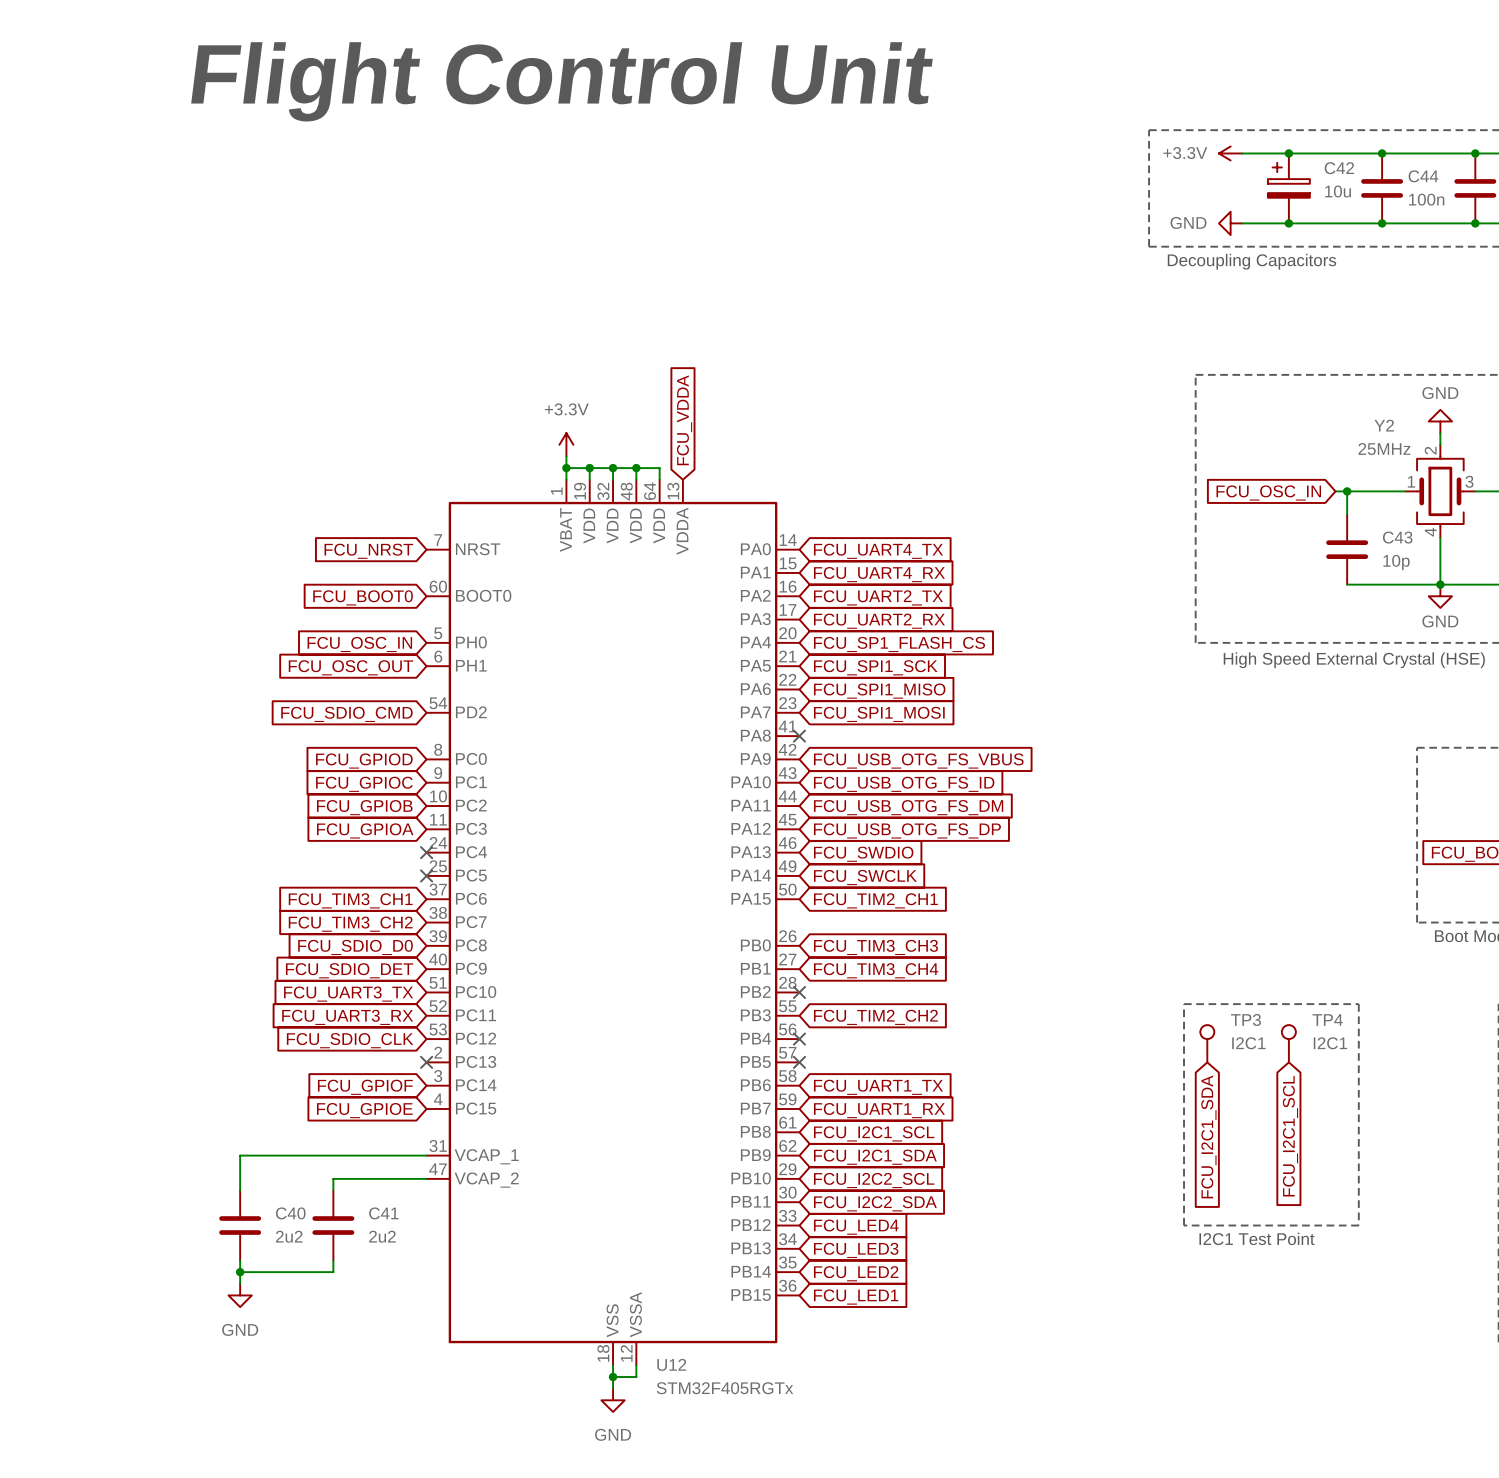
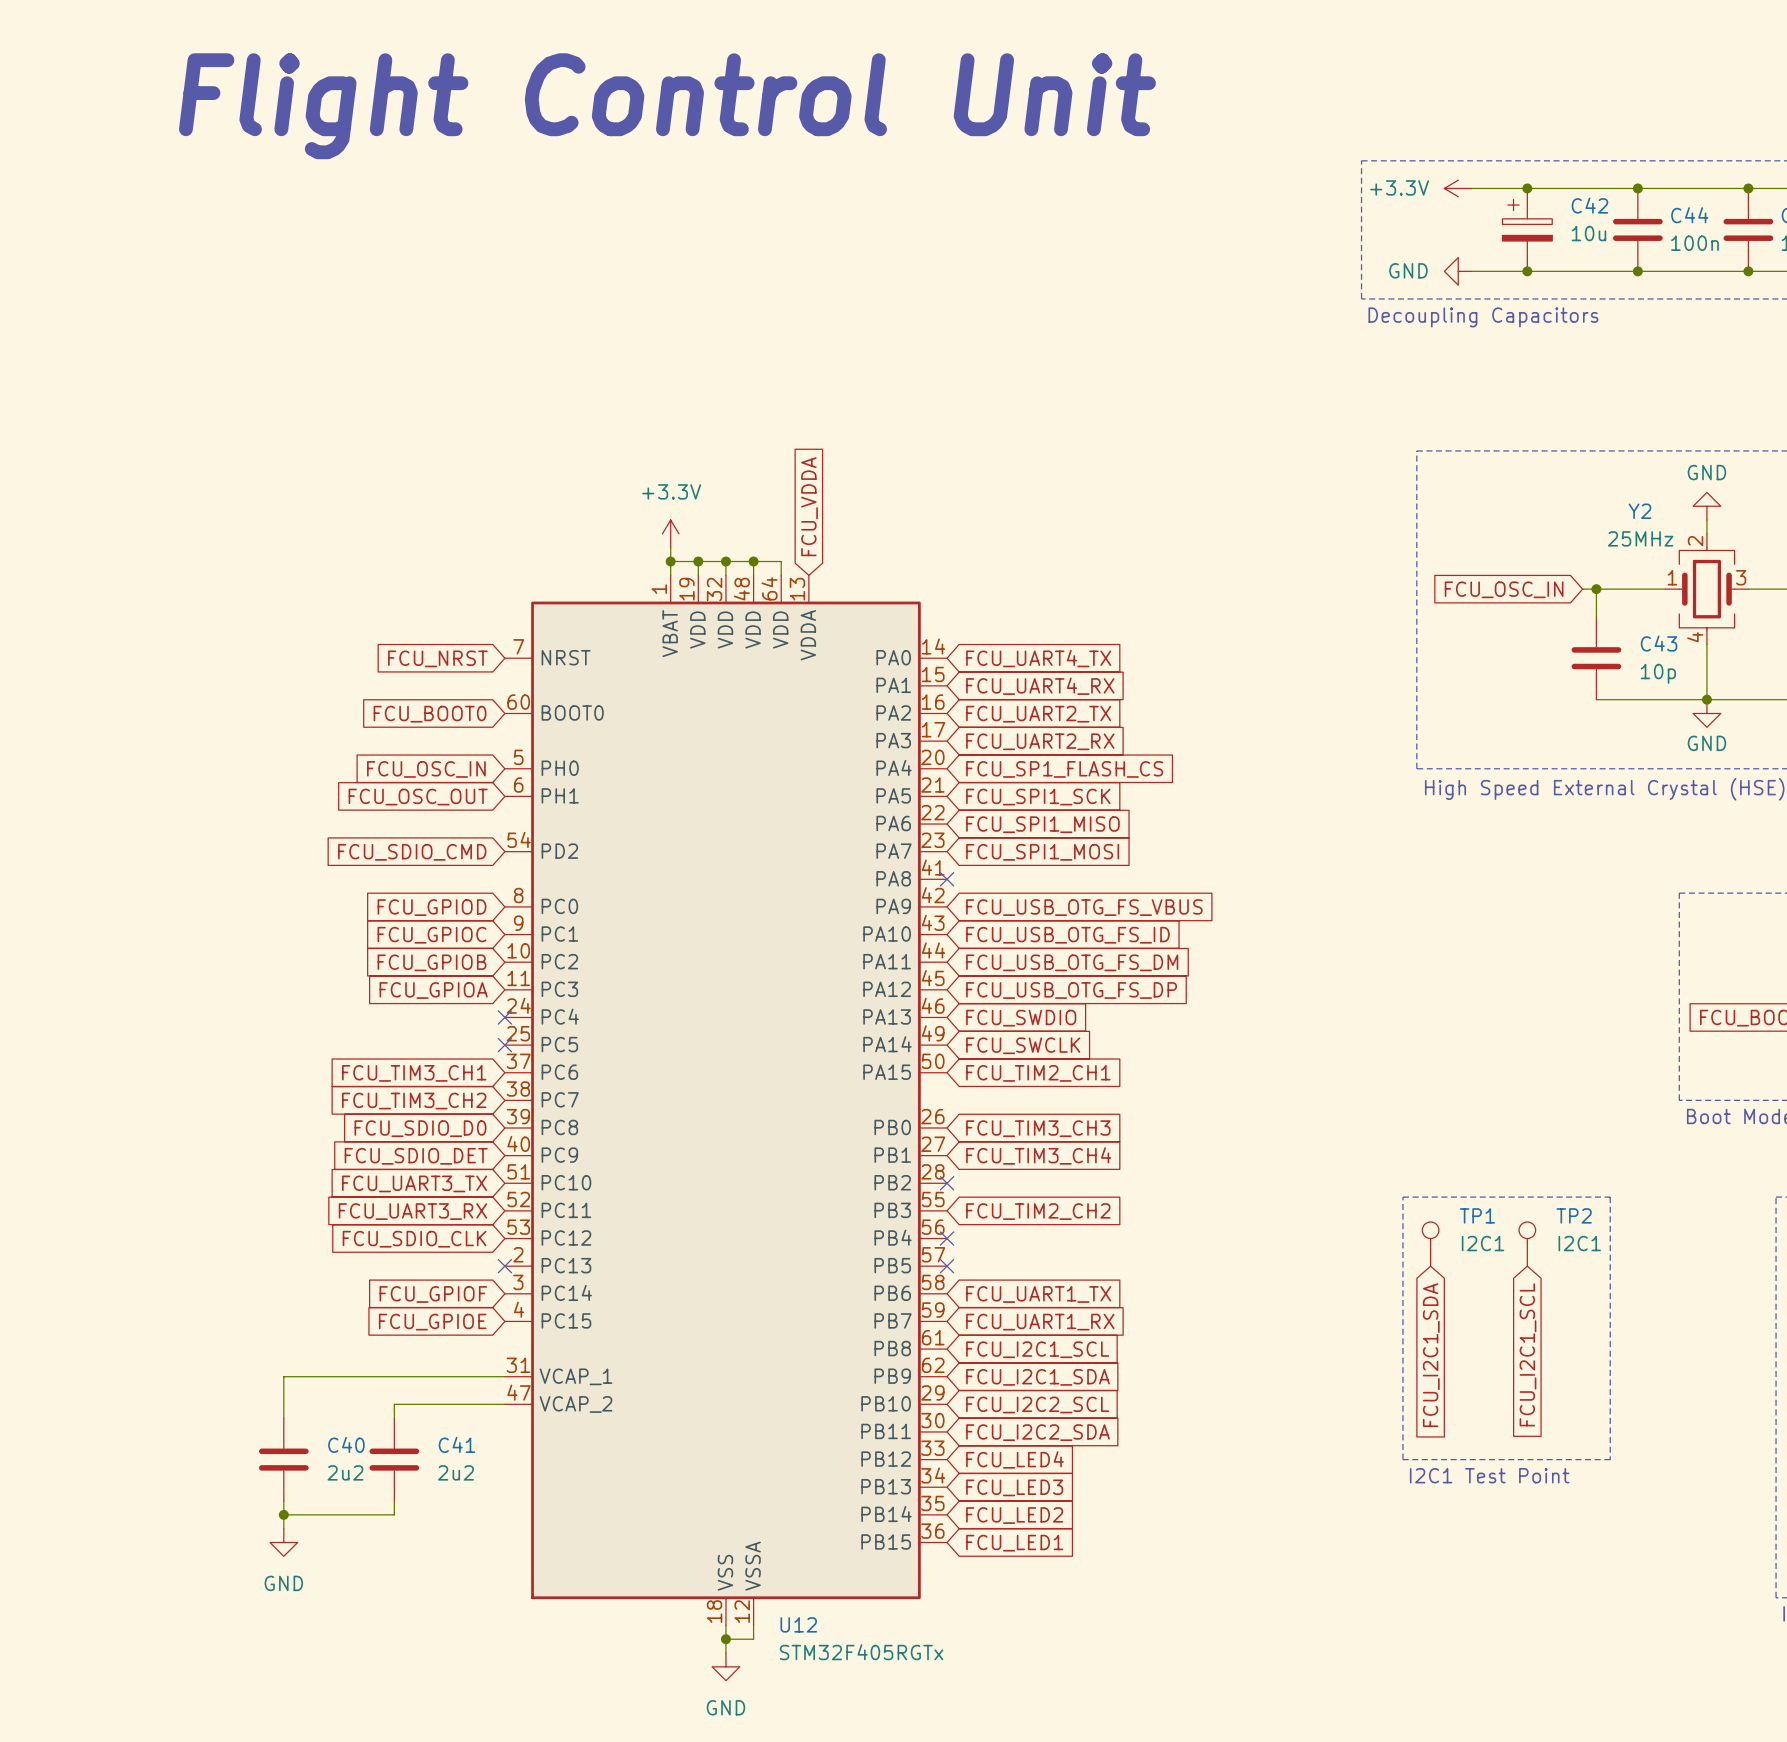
TP3 name: TP3 (1245, 1019) -> TP1 (1477, 1215)
TP4 name: TP4 (1327, 1019) -> TP2 (1574, 1215)

